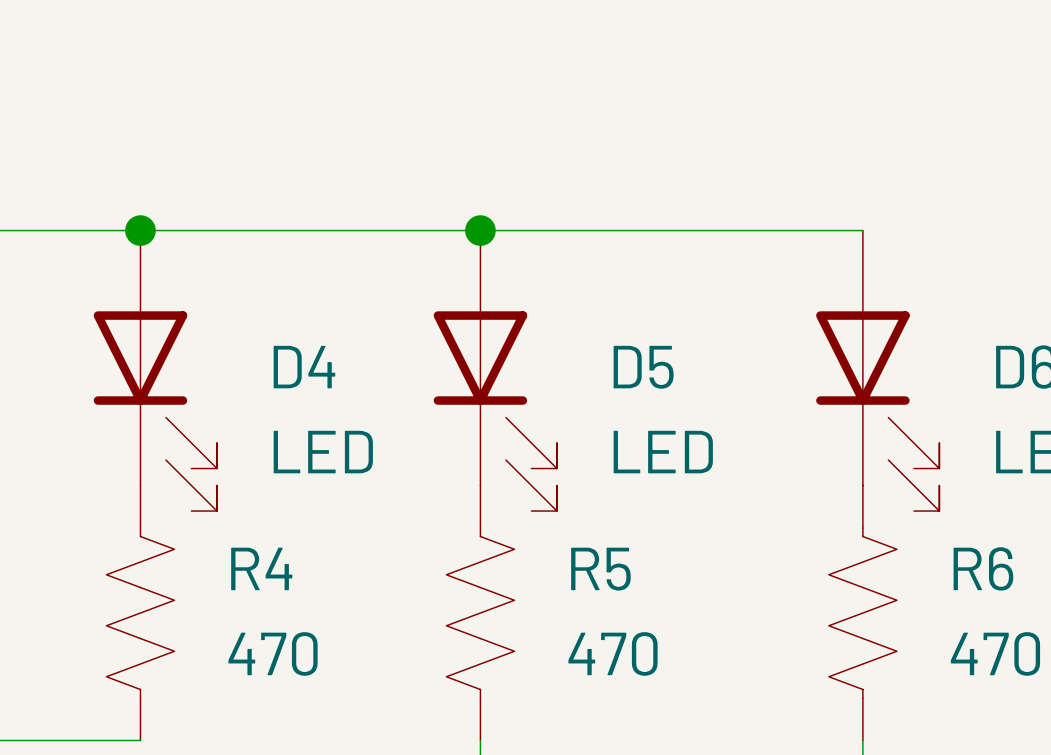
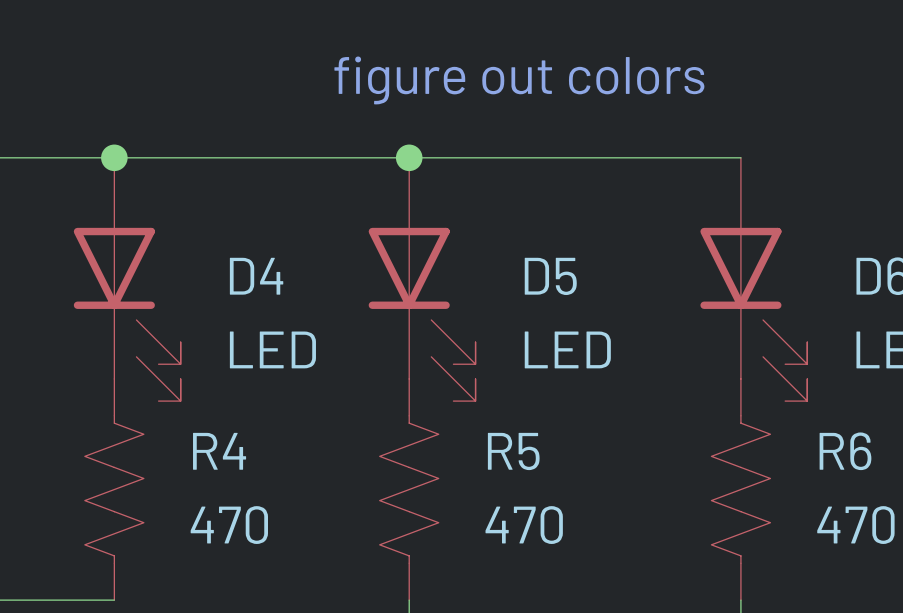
text: none -> figure out colors (519, 80)

